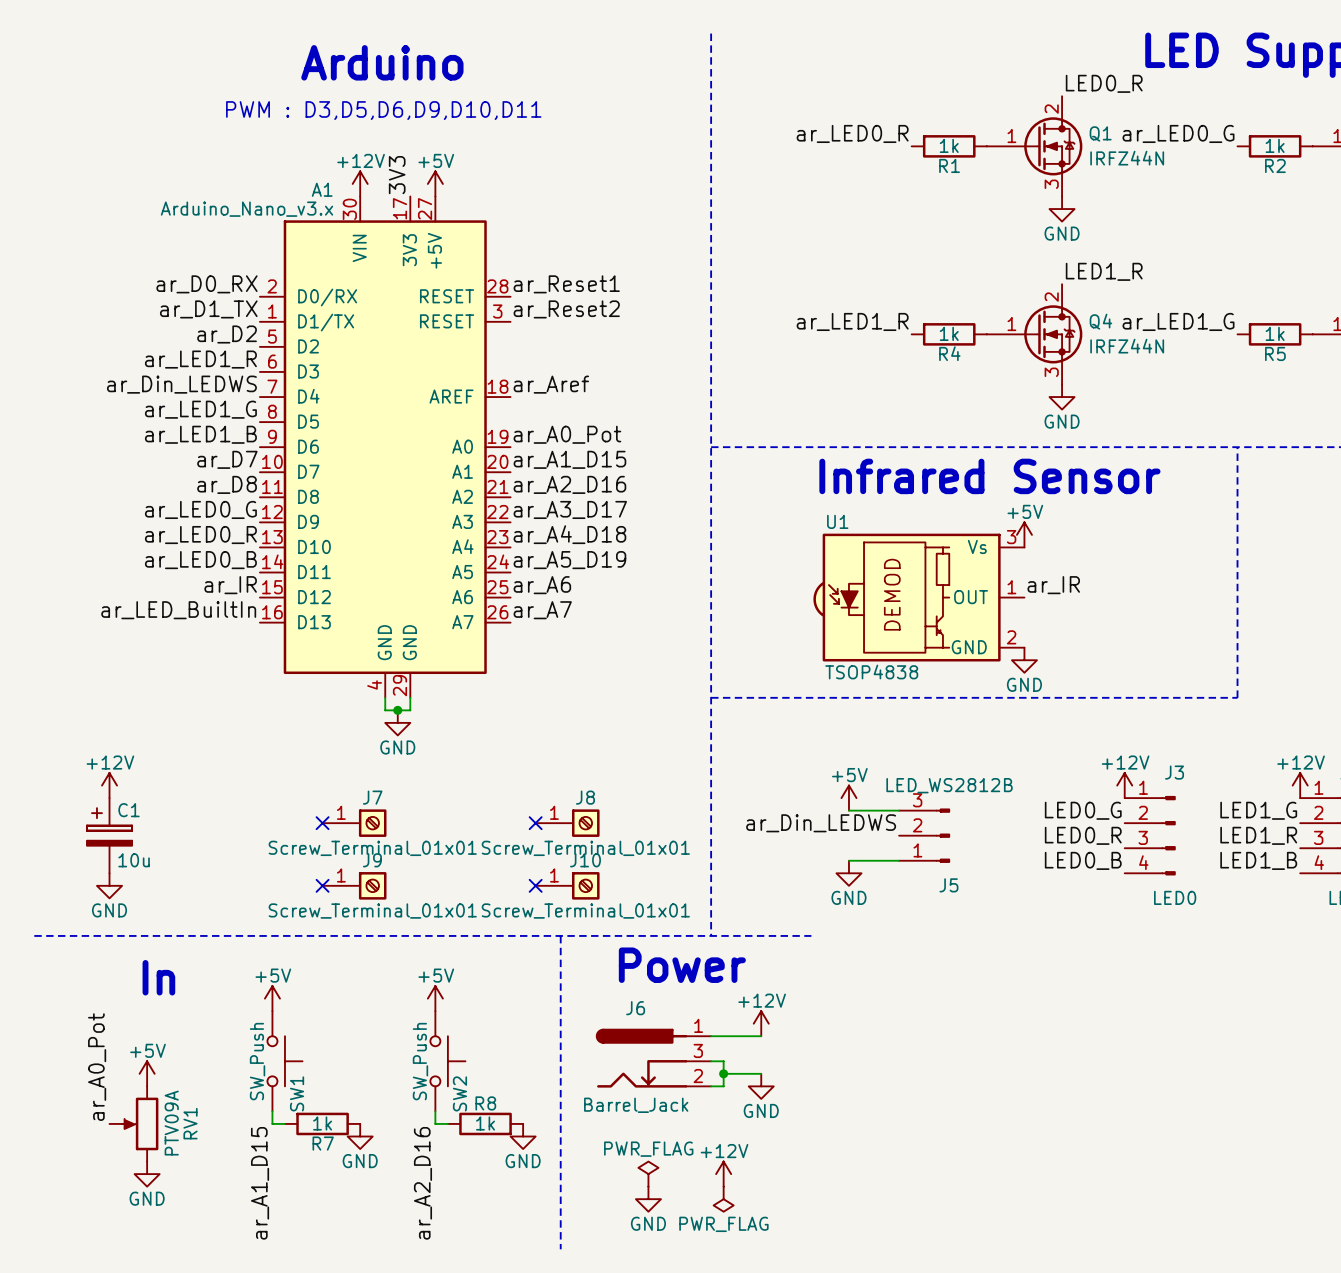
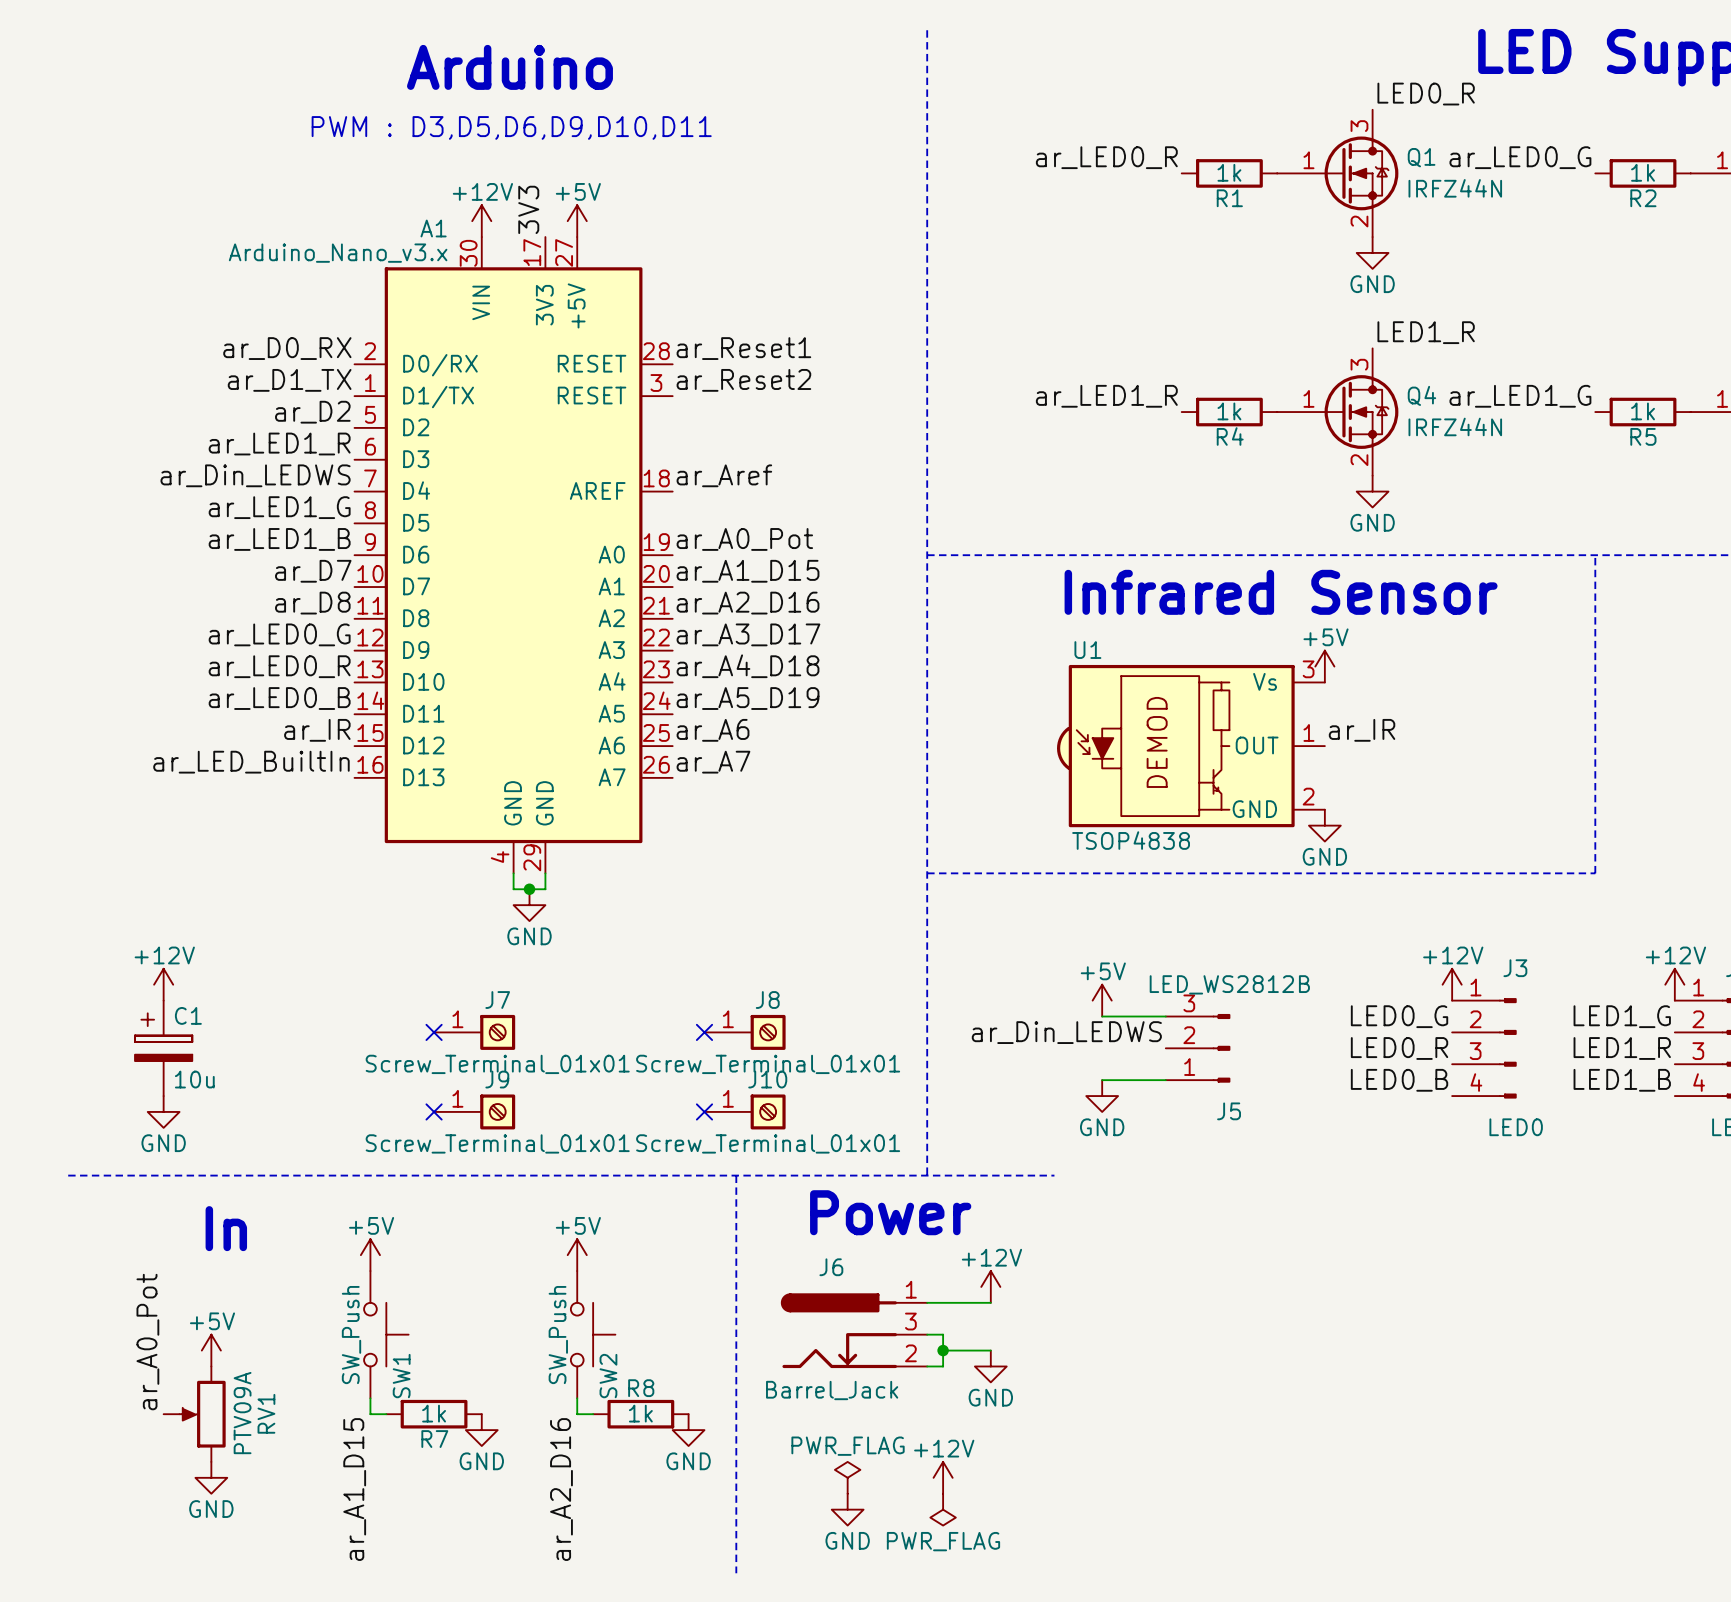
Q1 pin number: 2 (1051, 109) -> 3 (1359, 126)
Q1 pin number: 3 (1051, 184) -> 2 (1359, 221)
Q4 pin number: 2 (1051, 297) -> 3 (1359, 364)
Q4 pin number: 3 (1051, 372) -> 2 (1359, 460)

